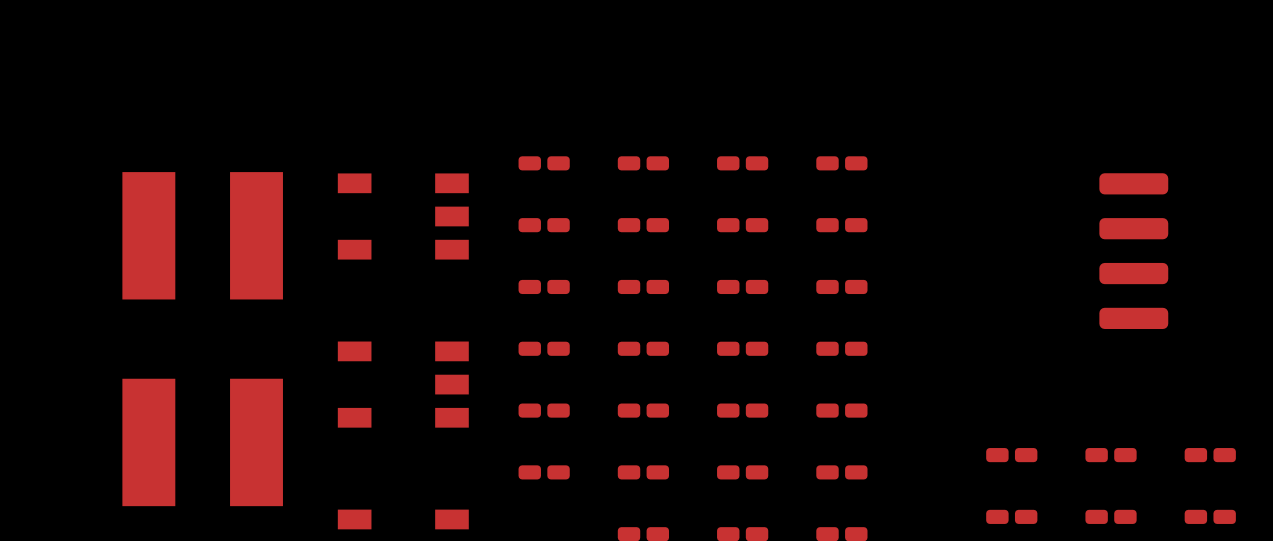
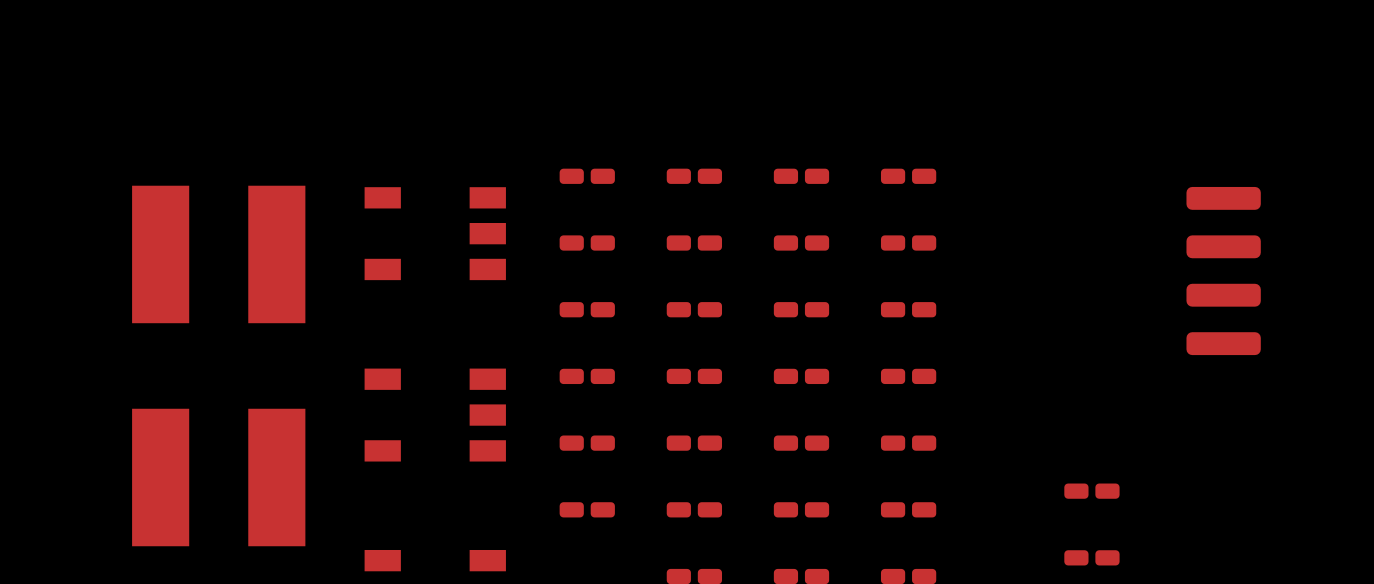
part: (1111, 455) -> none
part: (1210, 455) -> none
part: (1111, 516) -> none
part: (1210, 516) -> none

